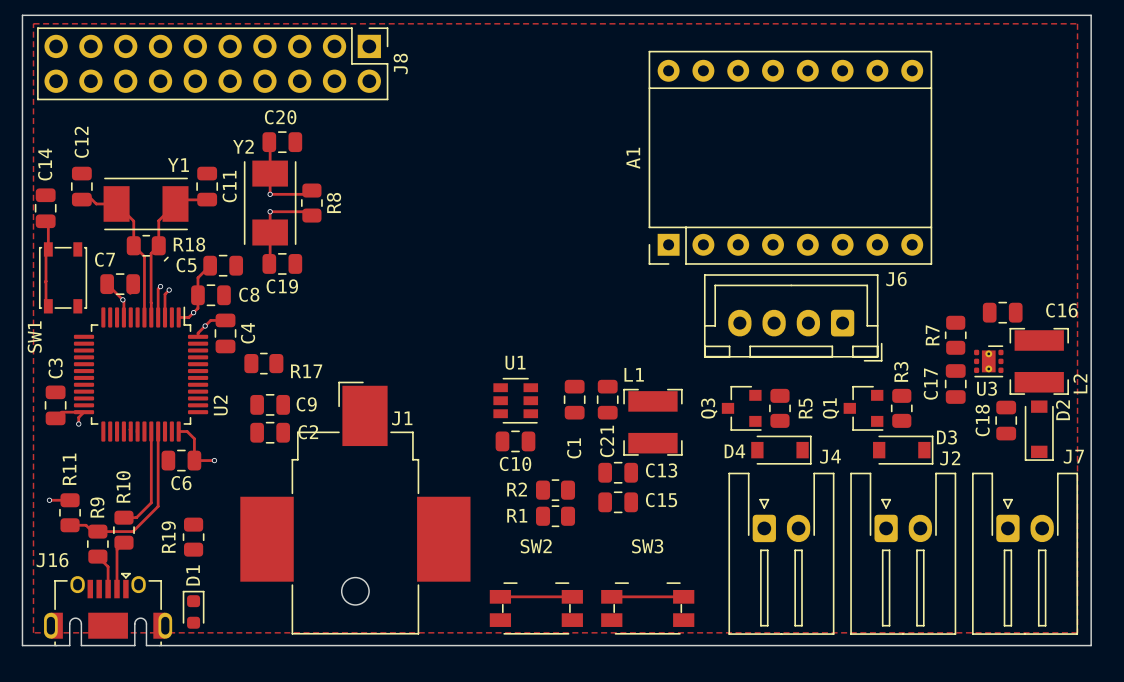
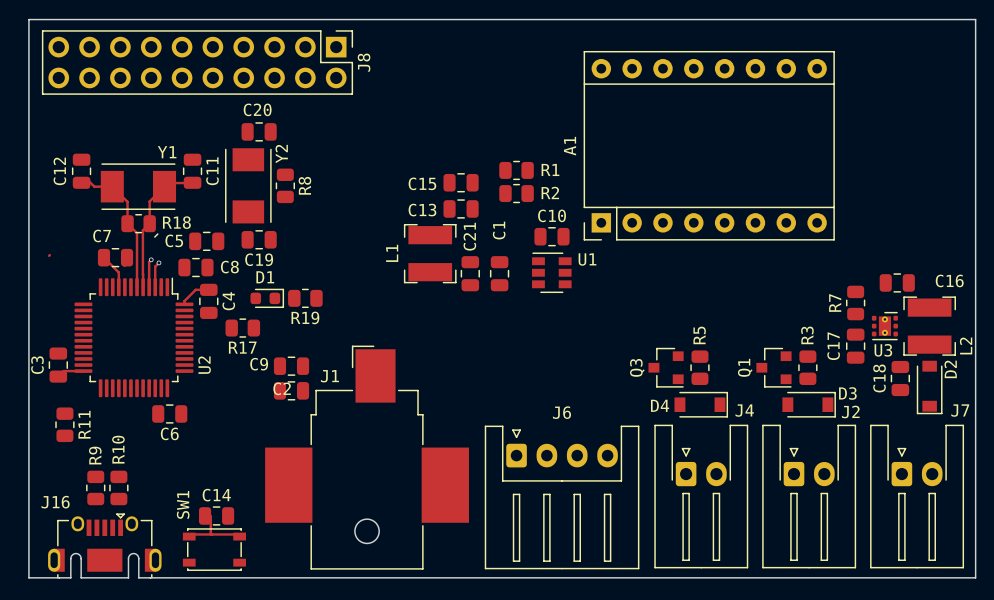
zone outline: (33, 23) (33, 632) (1077, 632) (1077, 23) (33, 23) -> none
track: (269, 140) (270, 194) (309, 194) (311, 192) -> none
C12 name position: C12 (81, 142) -> C12 (59, 171)
Y2 name rotation: 0° (243, 146) -> 90° counterclockwise (281, 154)
Y2 name position: Y2 (243, 146) -> Y2 (281, 154)
via: (270, 194) -> none
C14 rotation: 0° (45, 208) -> 90° clockwise (216, 515)
C14 position: (45, 208) -> (216, 515)
via: (270, 211) -> none
track: (311, 217) (306, 211) (270, 211) (269, 263) -> none
track: (45, 221) (48, 223) (48, 249) -> none
track: (45, 248) (45, 305) (47, 306) -> none
track: (210, 265) (197, 277) (197, 308) (188, 317) (178, 317) -> none
J6 footprint: [703, 274, 883, 362] -> [484, 425, 640, 570]
SW1 rotation: 0° (63, 277) -> 90° clockwise (214, 549)
SW1 position: (63, 277) -> (214, 549)
J6 name position: J6 (896, 279) -> J6 (561, 412)
via: (122, 299) -> none
via: (193, 312) -> none
via: (205, 326) -> none
SW1 name position: SW1 (34, 337) -> SW1 (183, 504)
U1 name position: U1 (515, 362) -> U1 (587, 259)
C3 name position: C3 (55, 368) -> C3 (37, 365)
R17 name position: R17 (306, 371) -> R17 (242, 347)
L1 name rotation: 0° (634, 374) -> 90° counterclockwise (392, 253)
L1 name position: L1 (634, 374) -> L1 (392, 253)
C1 position: (574, 399) -> (499, 273)
C21 position: (607, 399) -> (470, 273)
U1 rotation: 0° (515, 400) -> 180° (551, 272)
U1 position: (515, 400) -> (551, 272)
C9 position: (270, 404) -> (291, 366)
C9 name position: C9 (306, 404) -> C9 (259, 364)
R5 name position: R5 (805, 408) -> R5 (699, 335)
track: (84, 412) (78, 417) (78, 424) -> none
J1 name position: J1 (402, 418) -> J1 (329, 376)
L1 position: (652, 422) -> (430, 253)
via: (78, 424) -> none
track: (151, 431) (151, 502) (136, 517) (123, 517) -> none
track: (158, 431) (158, 506) (133, 531) (92, 531) (86, 525) (70, 525) -> none
track: (178, 431) (187, 431) (194, 438) (194, 460) (214, 460) -> none
C2 position: (270, 432) -> (291, 390)
C10 position: (515, 441) -> (552, 236)
C21 name position: C21 (607, 441) -> C21 (469, 236)
C1 name position: C1 (574, 448) -> C1 (499, 230)
via: (214, 460) -> none
C10 name position: C10 (515, 463) -> C10 (552, 215)
R11 name position: R11 (69, 469) -> R11 (84, 424)
C13 name position: C13 (661, 470) -> C13 (422, 210)
C13 position: (618, 472) -> (461, 208)
R2 name position: R2 (517, 489) -> R2 (550, 192)
R2 position: (555, 490) -> (516, 193)
track: (49, 500) (70, 500) -> none
via: (49, 500) -> none
C15 name position: C15 (661, 500) -> C15 (422, 183)
C15 position: (618, 502) -> (461, 182)
J1 position: (355, 508) -> (367, 457)
R11 position: (70, 512) -> (64, 424)
R1 name position: R1 (517, 515) -> R1 (550, 169)
R1 position: (555, 516) -> (516, 170)
R10 position: (123, 530) -> (118, 487)
R19 name position: R19 (168, 537) -> R19 (305, 317)
R19 rotation: 0° (193, 537) -> 90° clockwise (305, 298)
R19 position: (193, 537) -> (305, 298)
track: (123, 542) (117, 549) (117, 589) -> none
track: (97, 556) (108, 566) (108, 589) -> none
track: none -> (210, 515) (211, 534)
track: none -> (240, 534) (188, 535)
track: (500, 596) (572, 596) -> none
track: (611, 596) (683, 596) -> none
SW2: (536, 608) -> none
SW3: (647, 608) -> none
D1 rotation: 0° (193, 609) -> 90° clockwise (267, 298)
D1 position: (193, 609) -> (267, 298)

